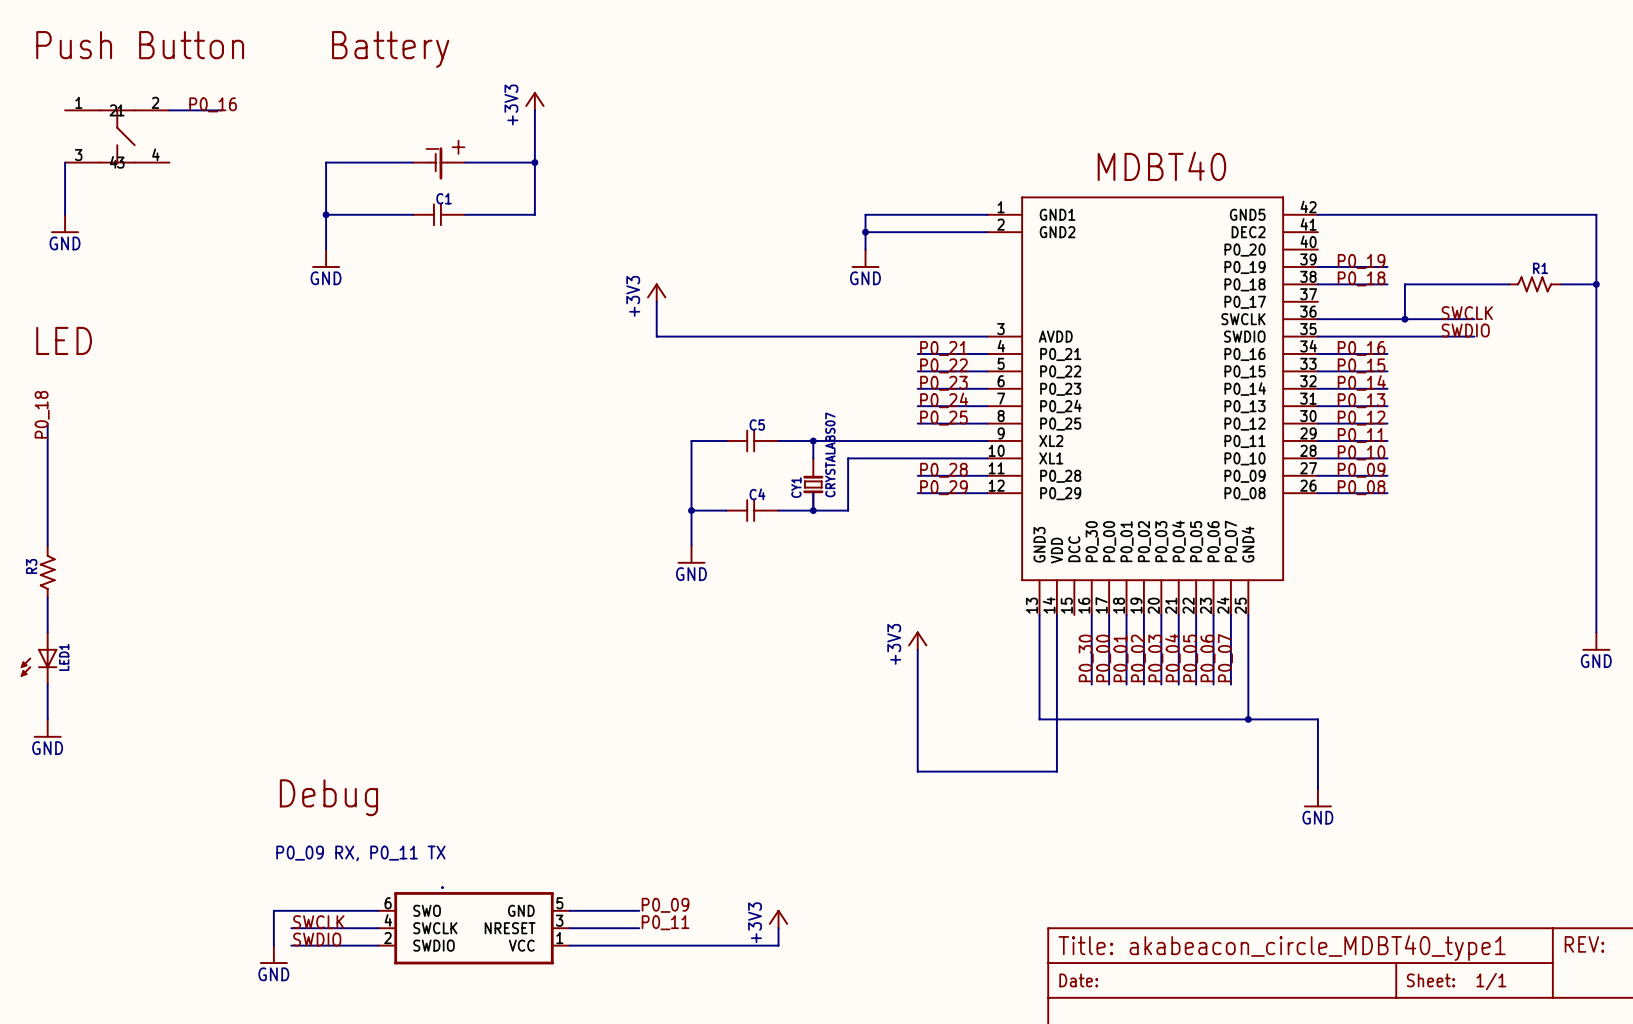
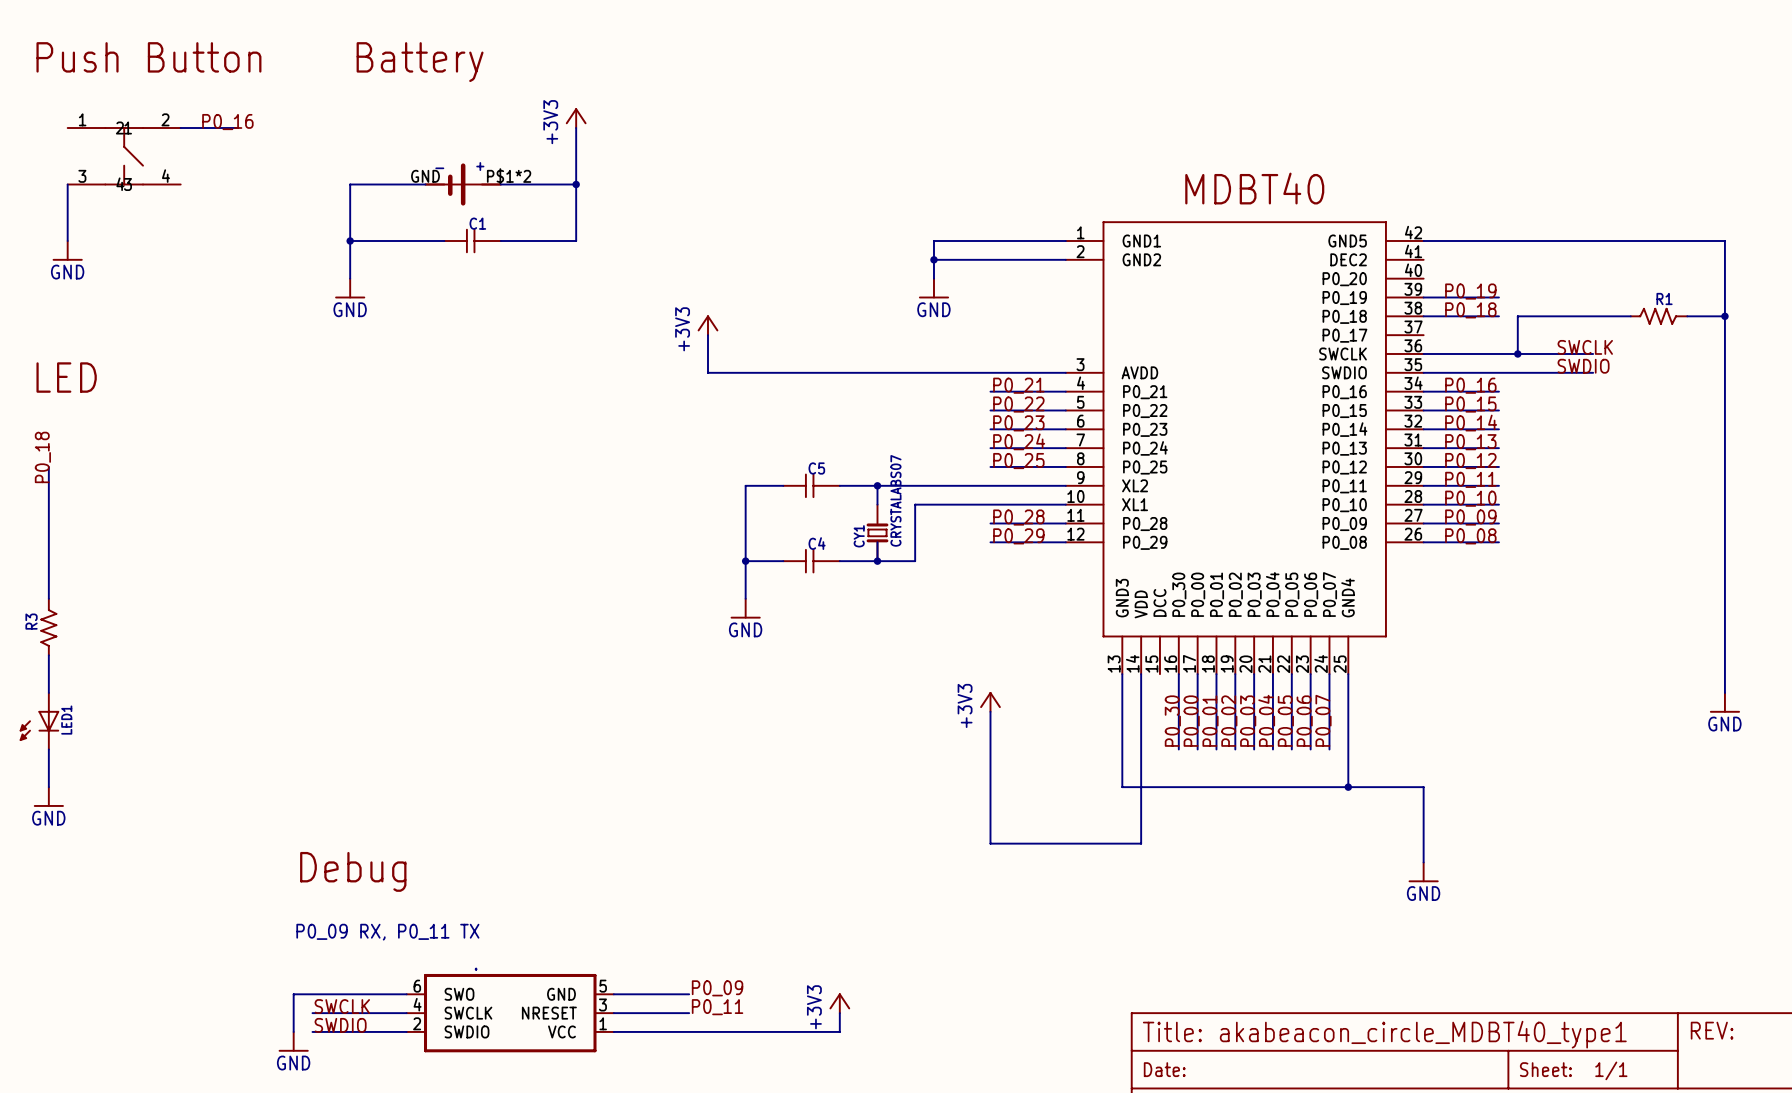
part: none -> (463, 184)
part: (439, 163) -> none

